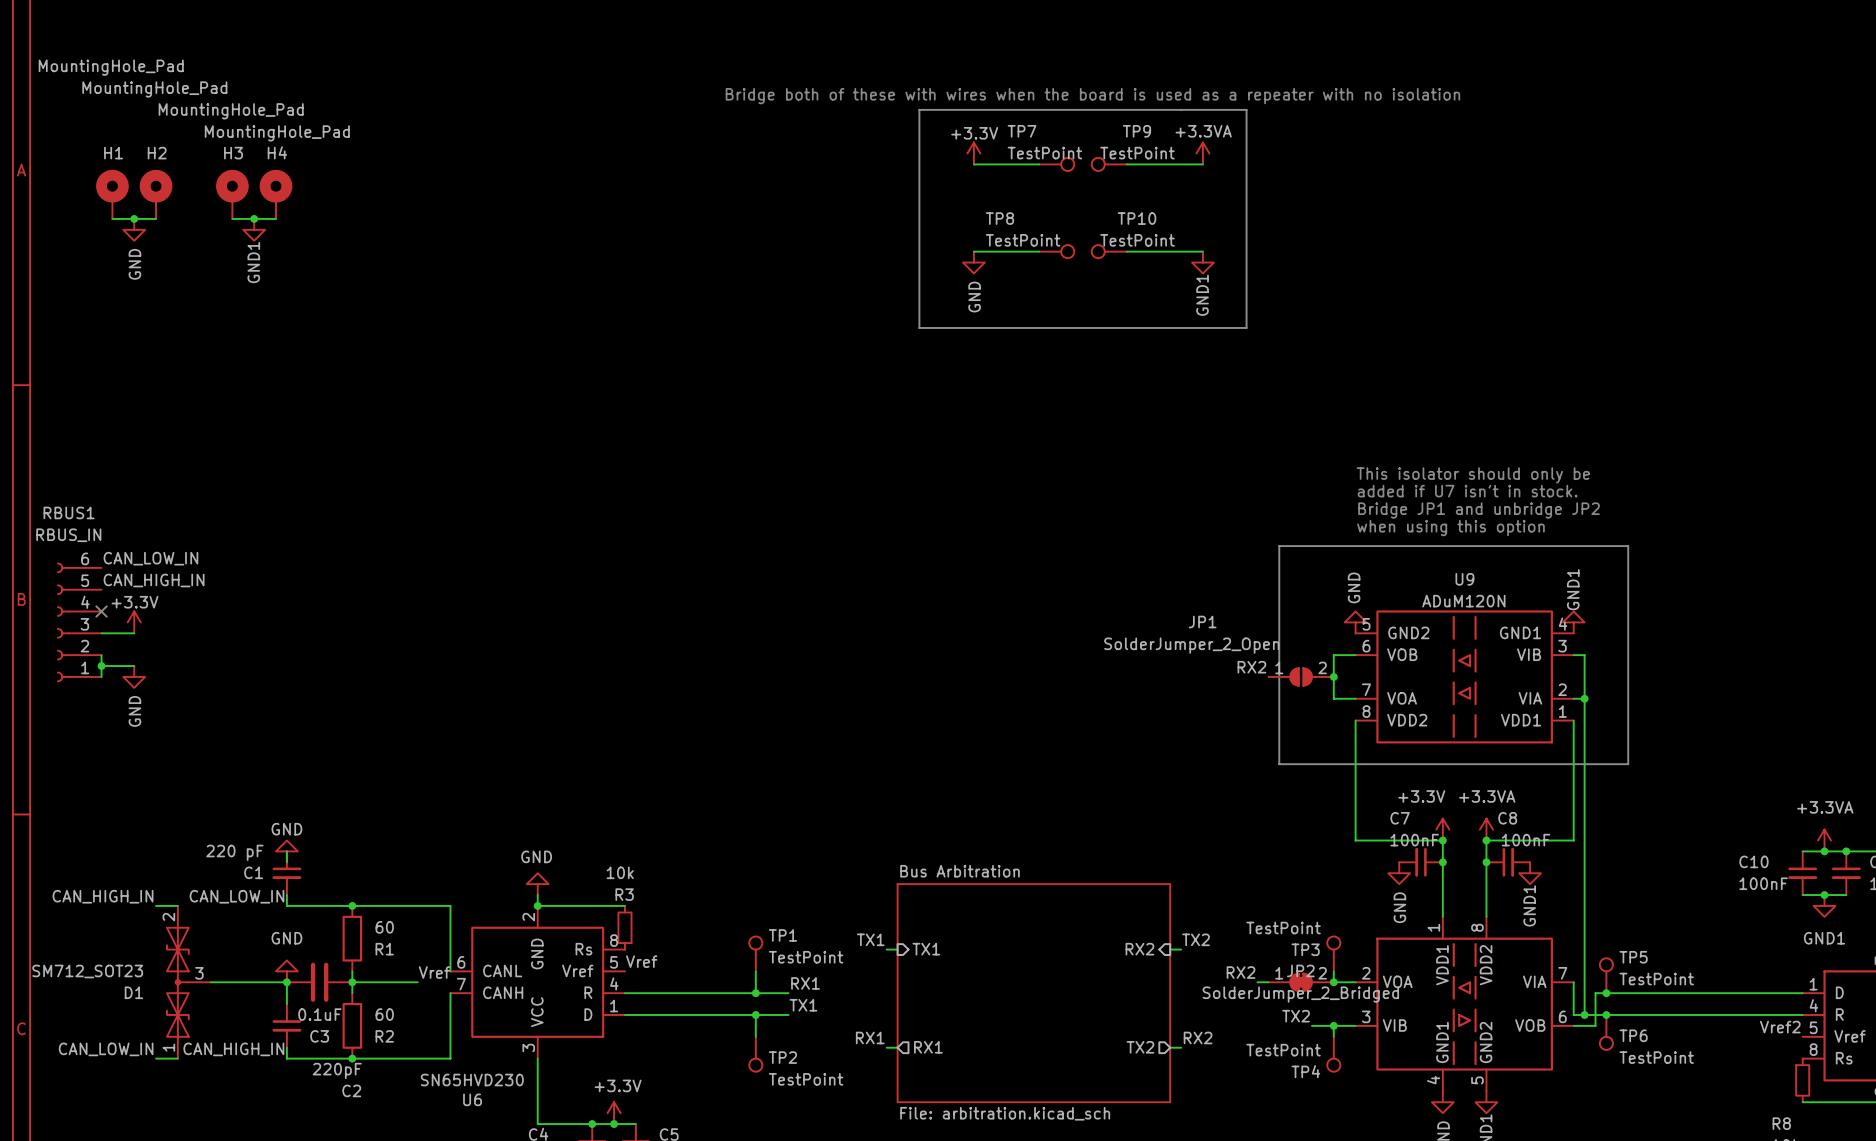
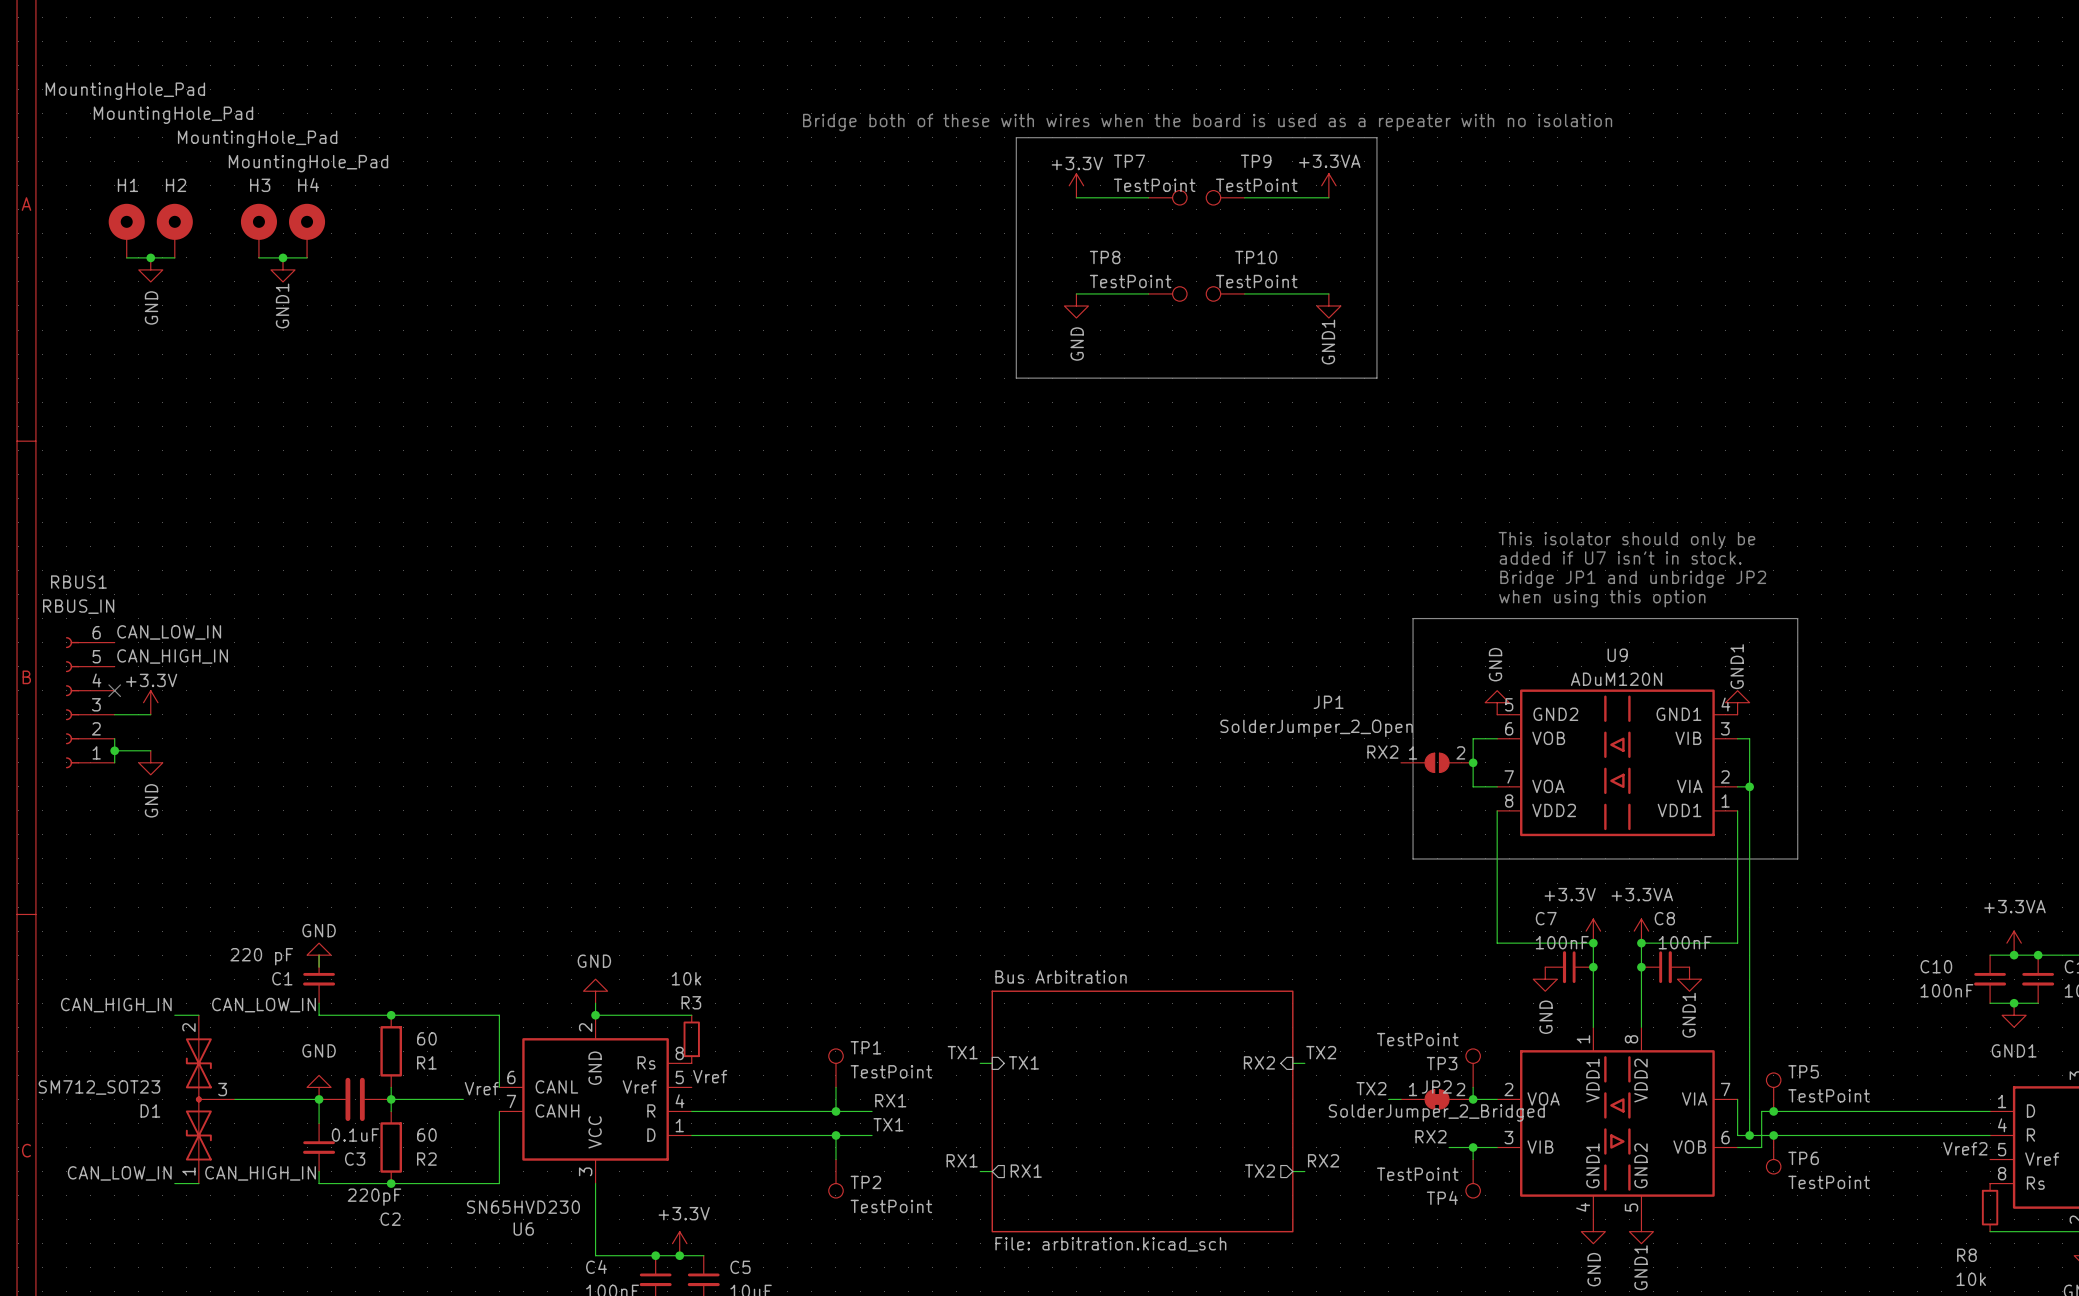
label: RX2 (1241, 972) -> TX2 (1371, 1088)
label: TX2 (1296, 1016) -> RX2 (1430, 1136)

